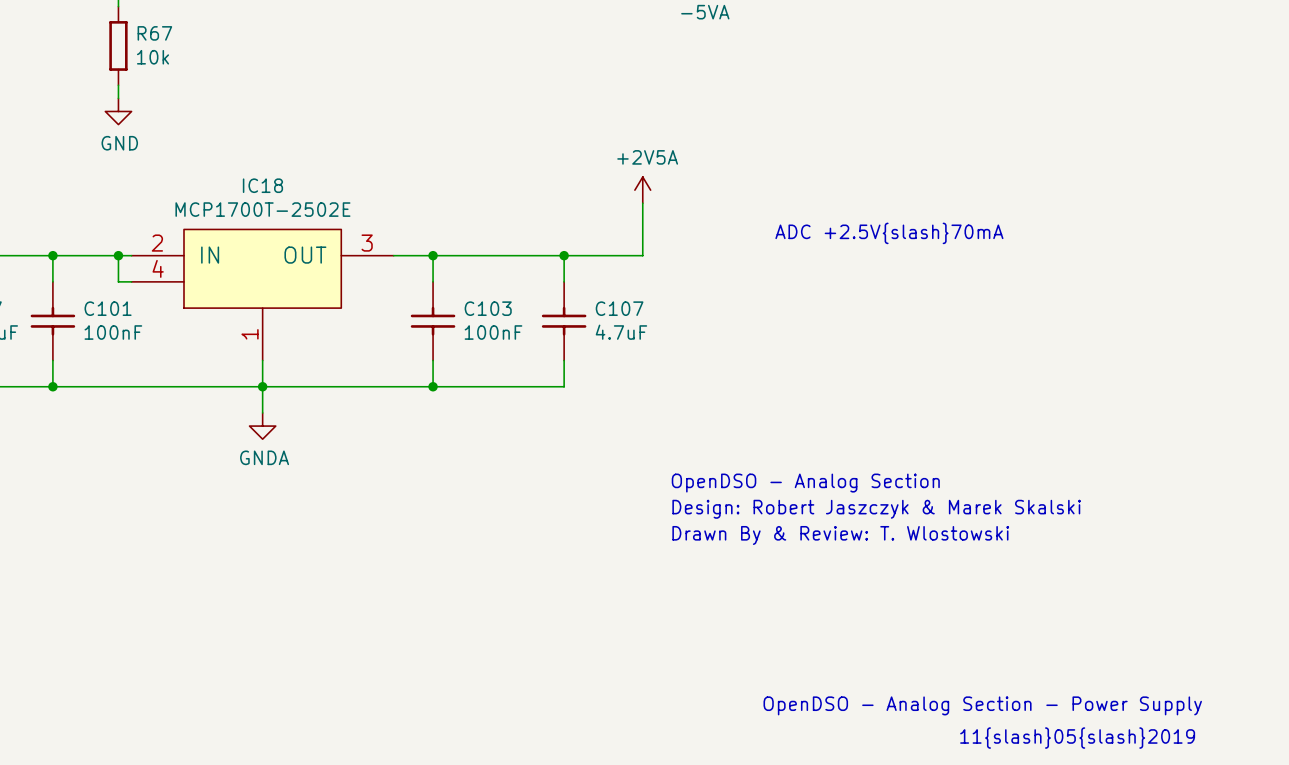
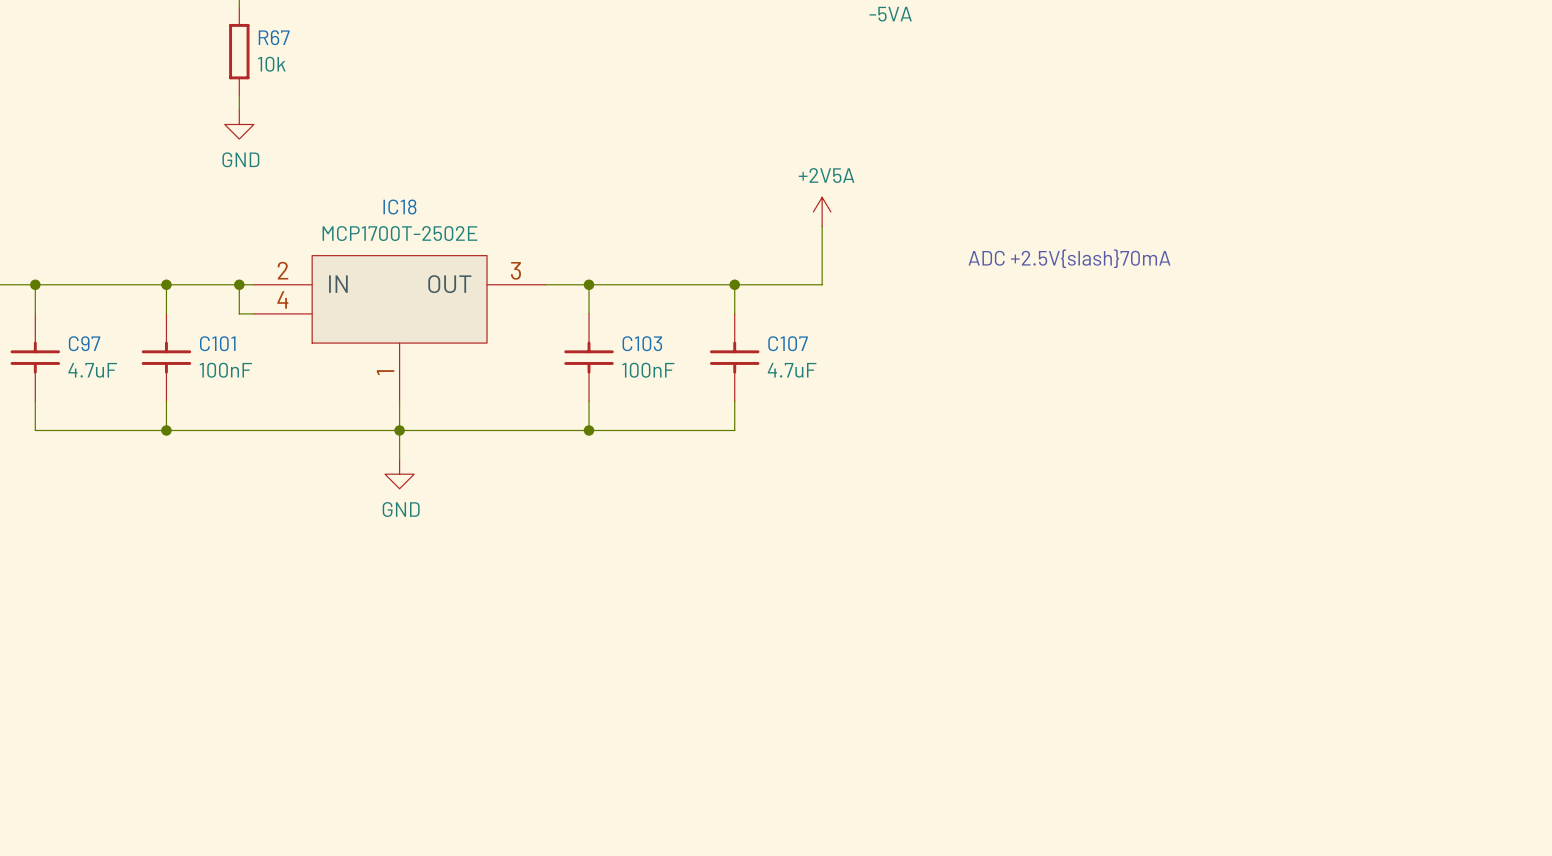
power symbol: GNDA (262, 426) -> GND (399, 474)
text: OpenDSO - Analog Section (805, 483) -> none
text: Design: Robert Jaszczyk & Marek Skalski (876, 509) -> none
text: Drawn By & Review: T. Wlostowski (840, 535) -> none
text: OpenDSO - Analog Section - Power Supply (982, 705) -> none
text: 11{slash}05{slash}2019 (1077, 738) -> none

